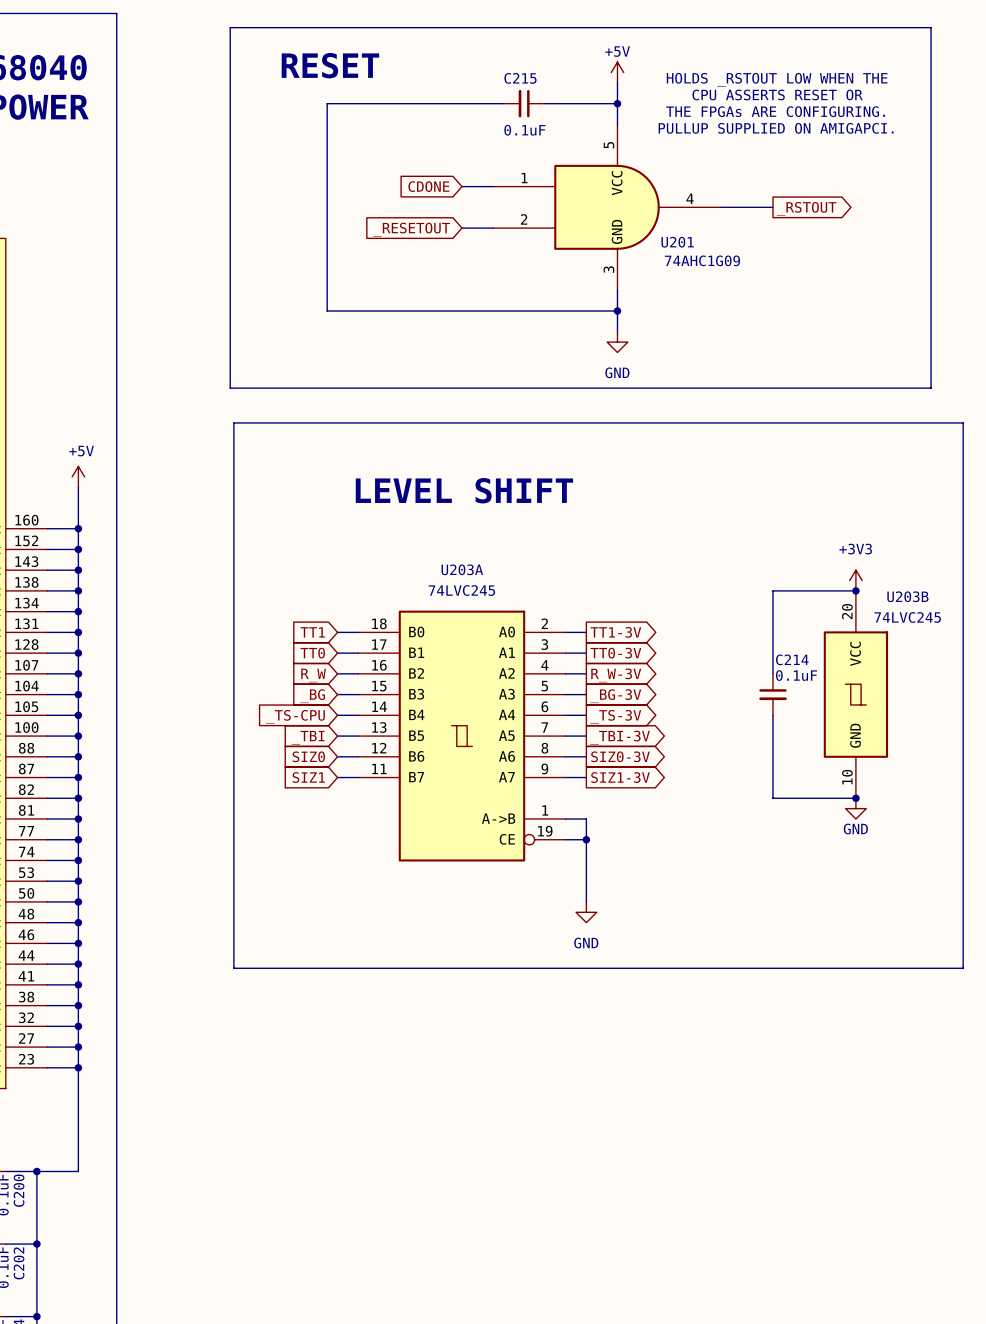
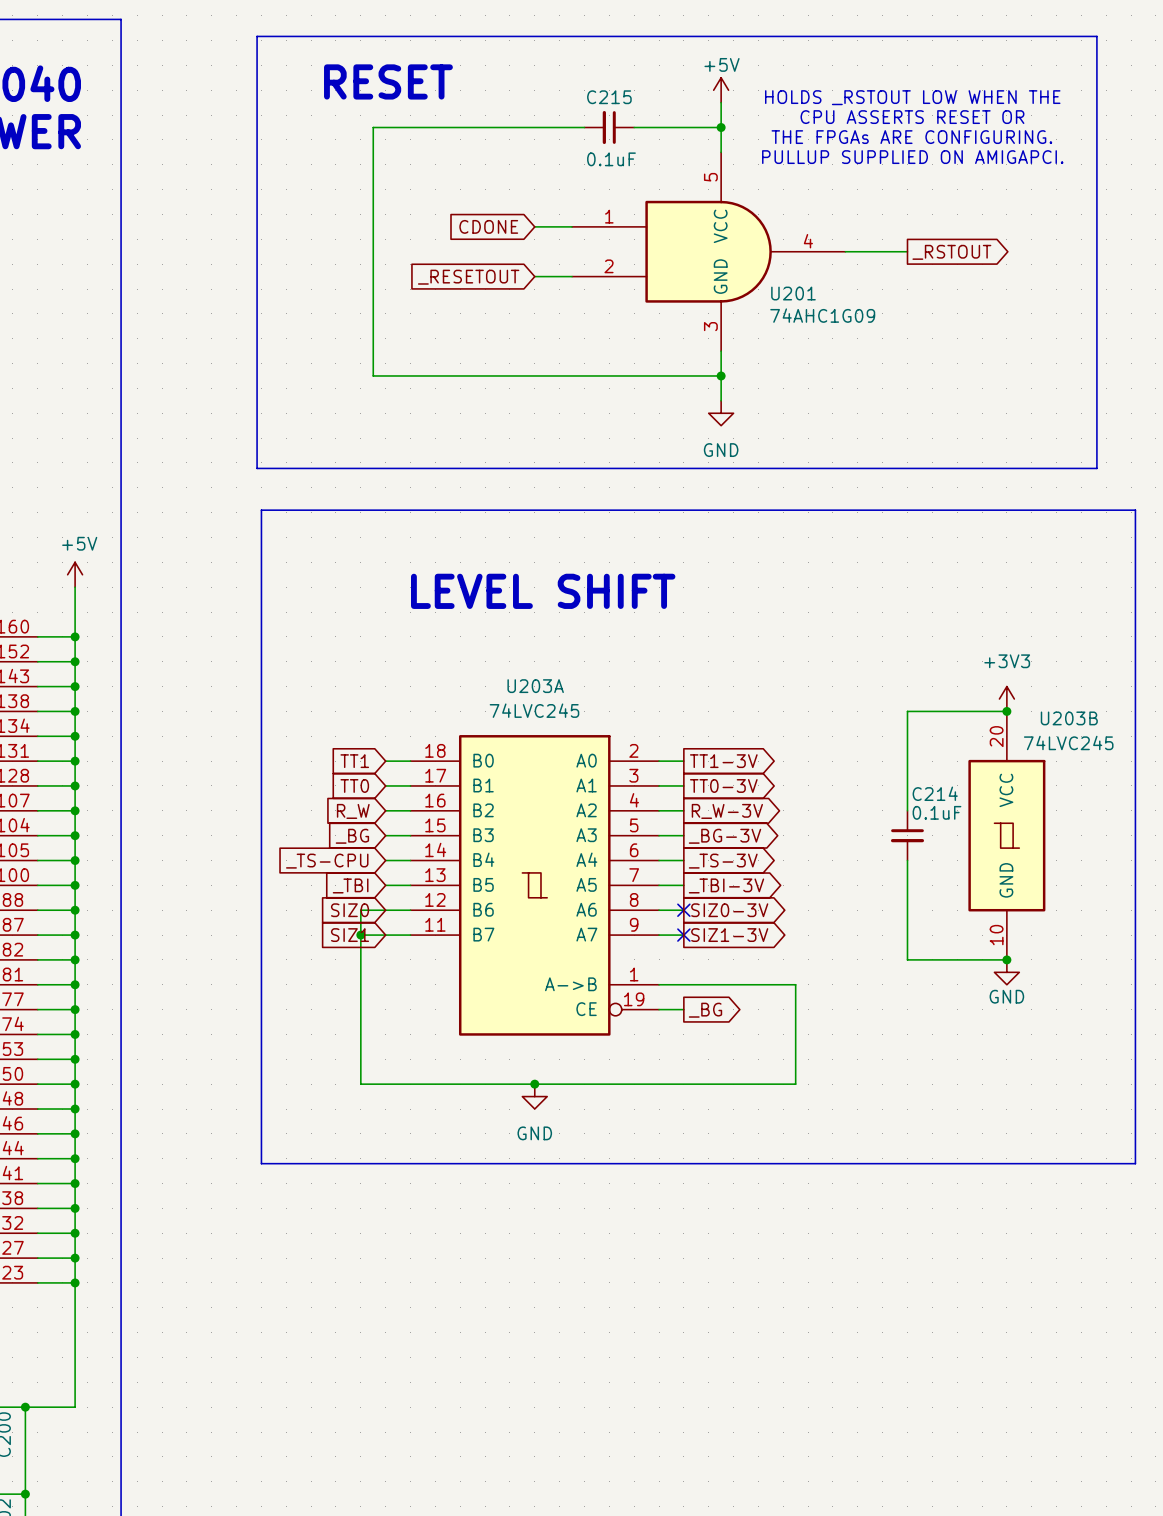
no-connect mark: none -> (683, 910)
wire: none -> (360, 935) (385, 935)
junction: none -> (360, 935)
no-connect mark: none -> (683, 935)
wire: (586, 819) (586, 901) -> (683, 984) (795, 984) (795, 1084) (360, 1084) (360, 910) (385, 910)
junction: (586, 839) -> none
global label: none -> _BG (705, 1010)
junction: none -> (534, 1084)
power symbol position: GND (586, 912) -> GND (534, 1096)

